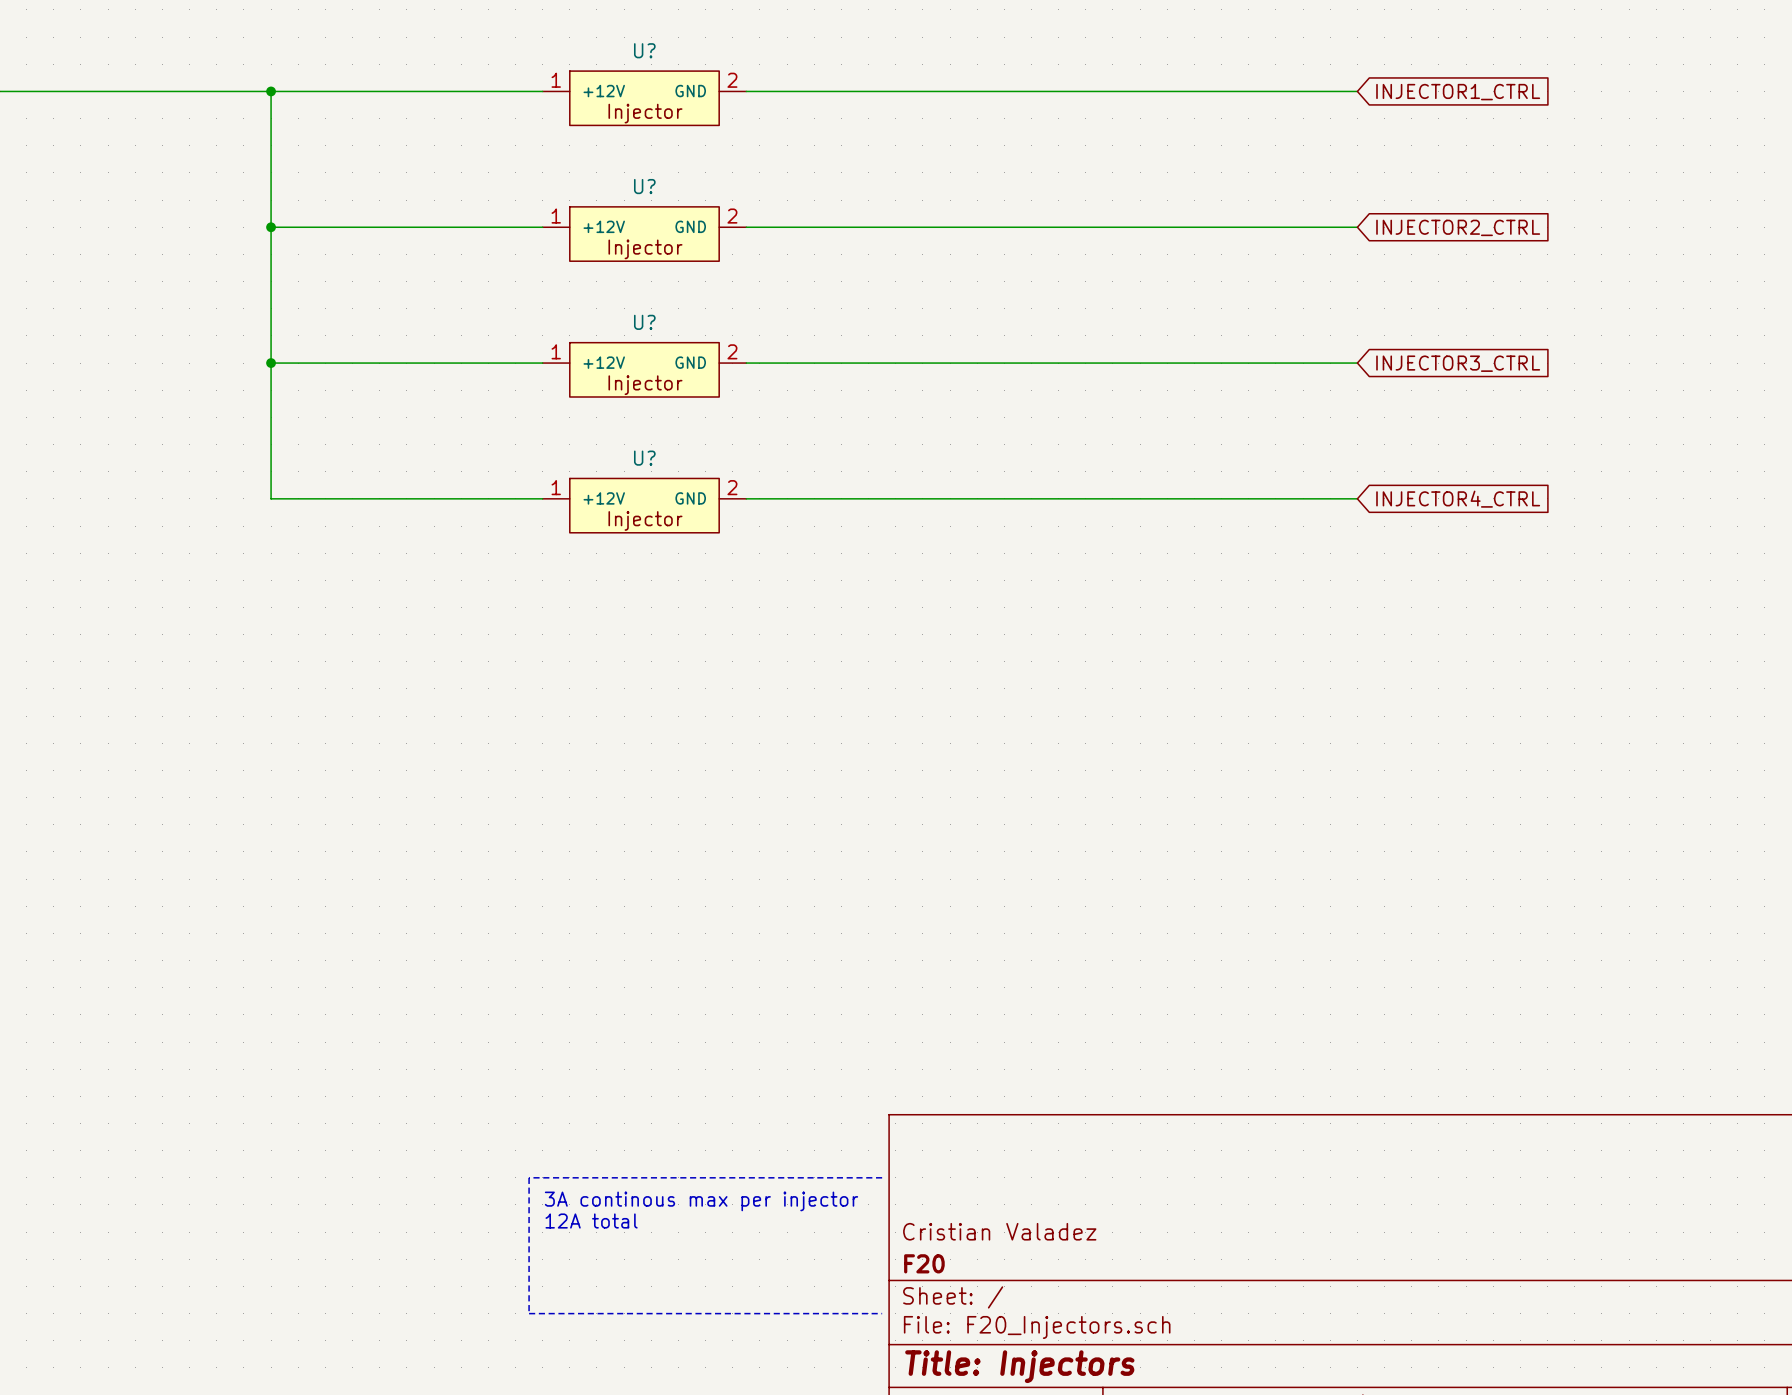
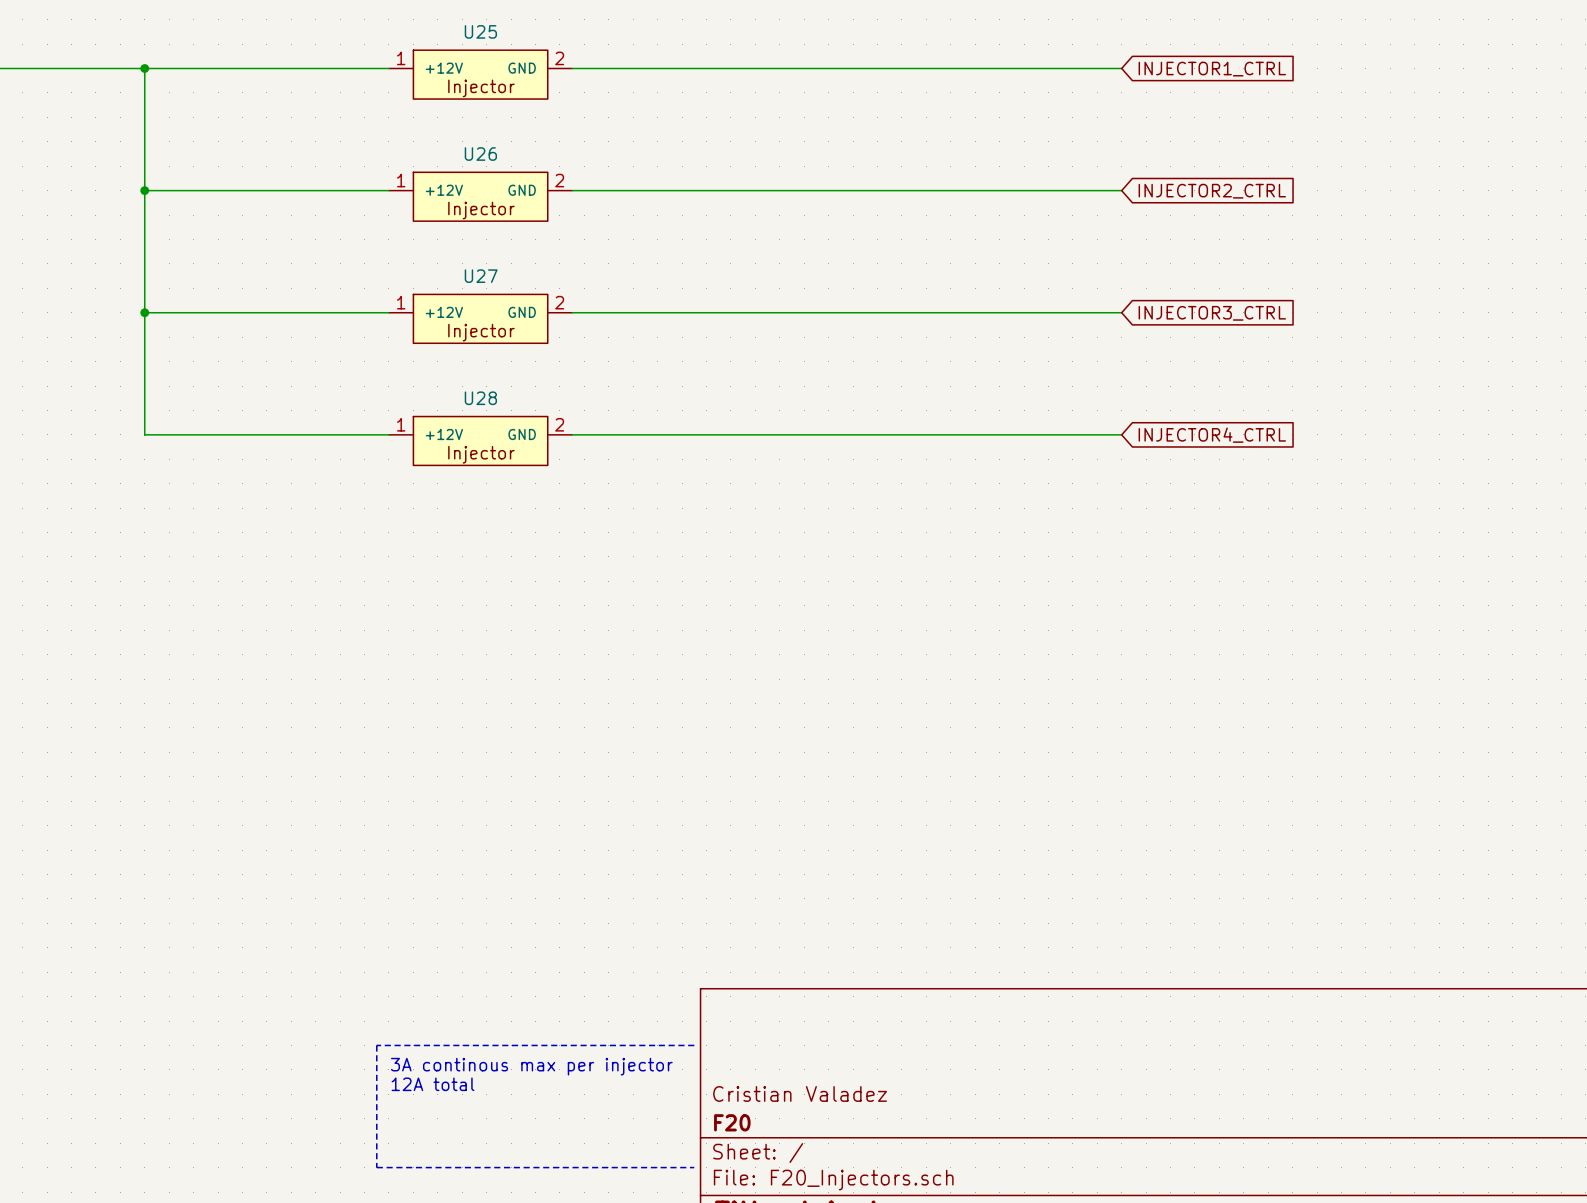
U? name: U? (644, 50) -> U25 (480, 31)
U? name: U? (644, 186) -> U26 (480, 154)
U? name: U? (644, 322) -> U27 (481, 276)
U? name: U? (644, 458) -> U28 (480, 398)

